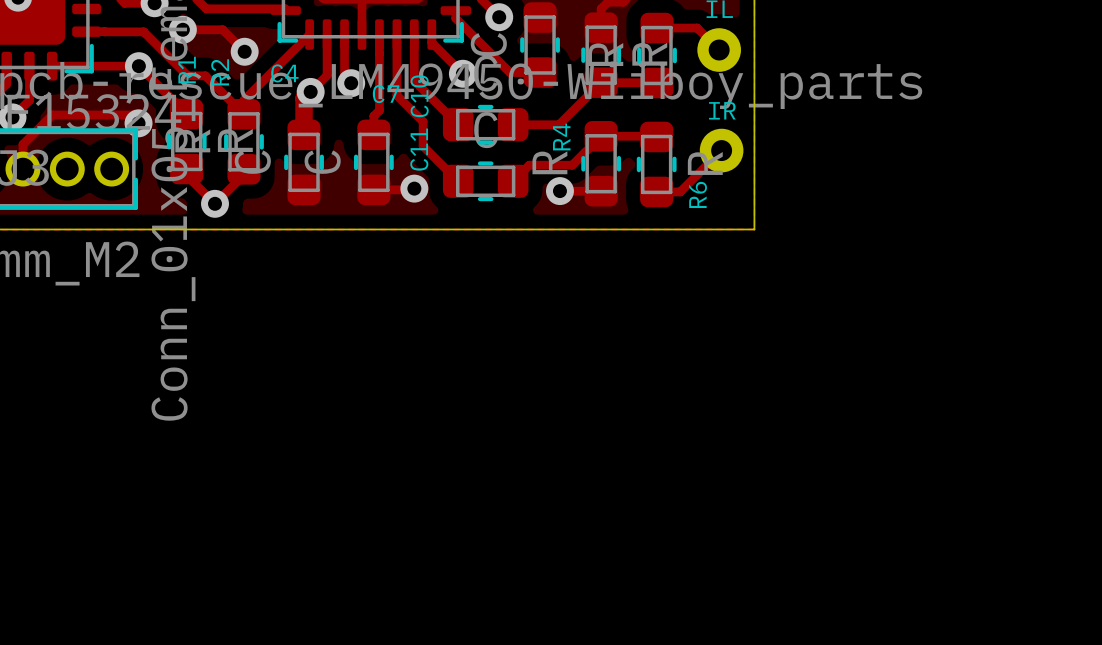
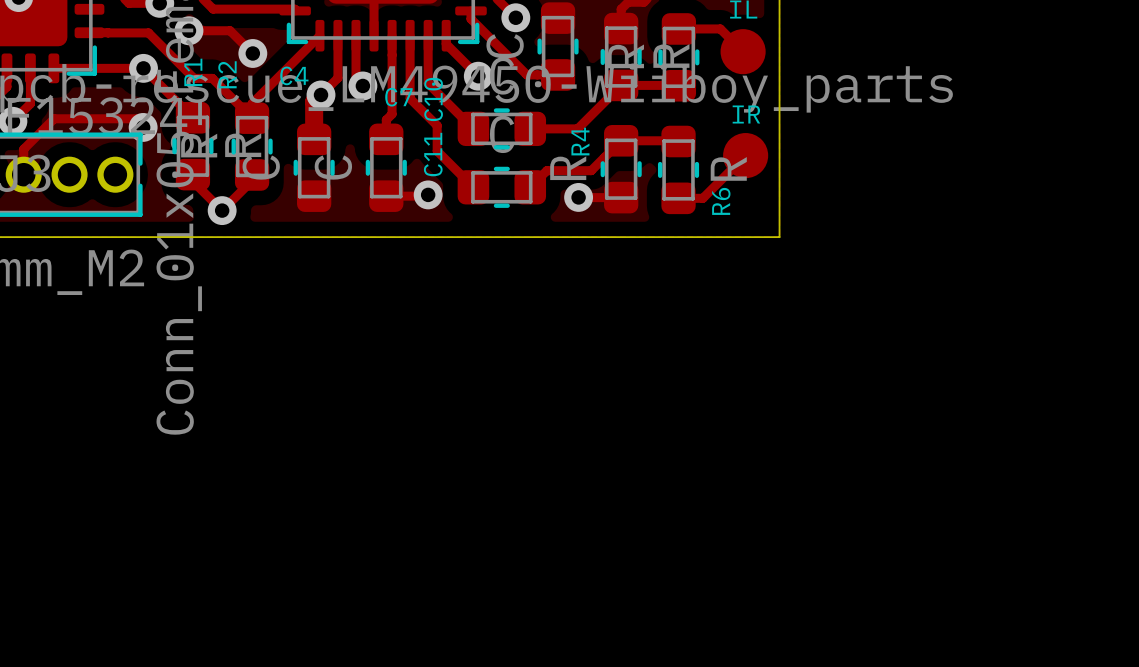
part footprint: [697, 28, 741, 72] -> [720, 29, 766, 75]
part footprint: [699, 128, 744, 173] -> [723, 133, 769, 179]

